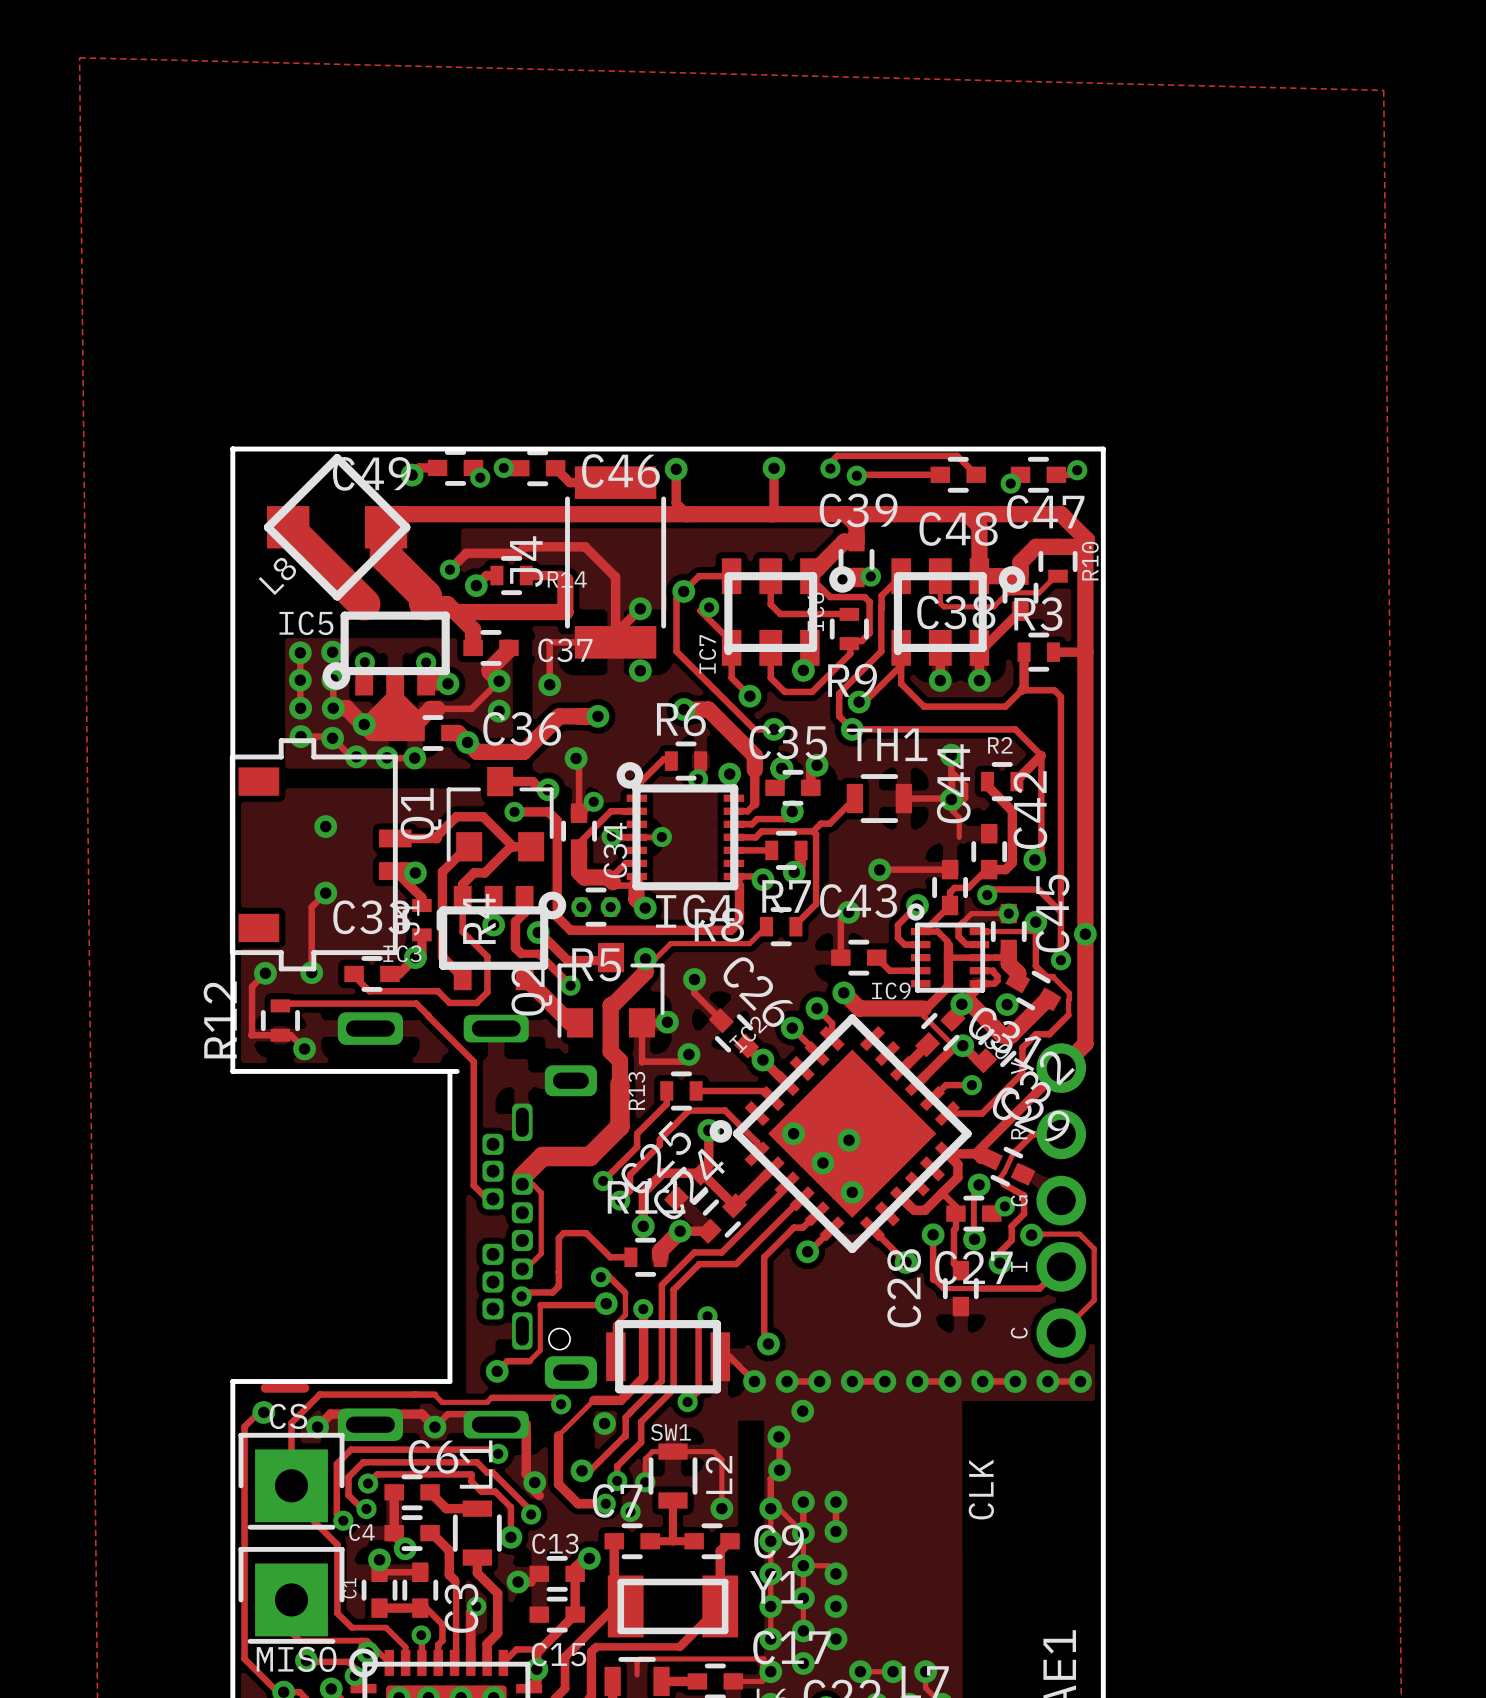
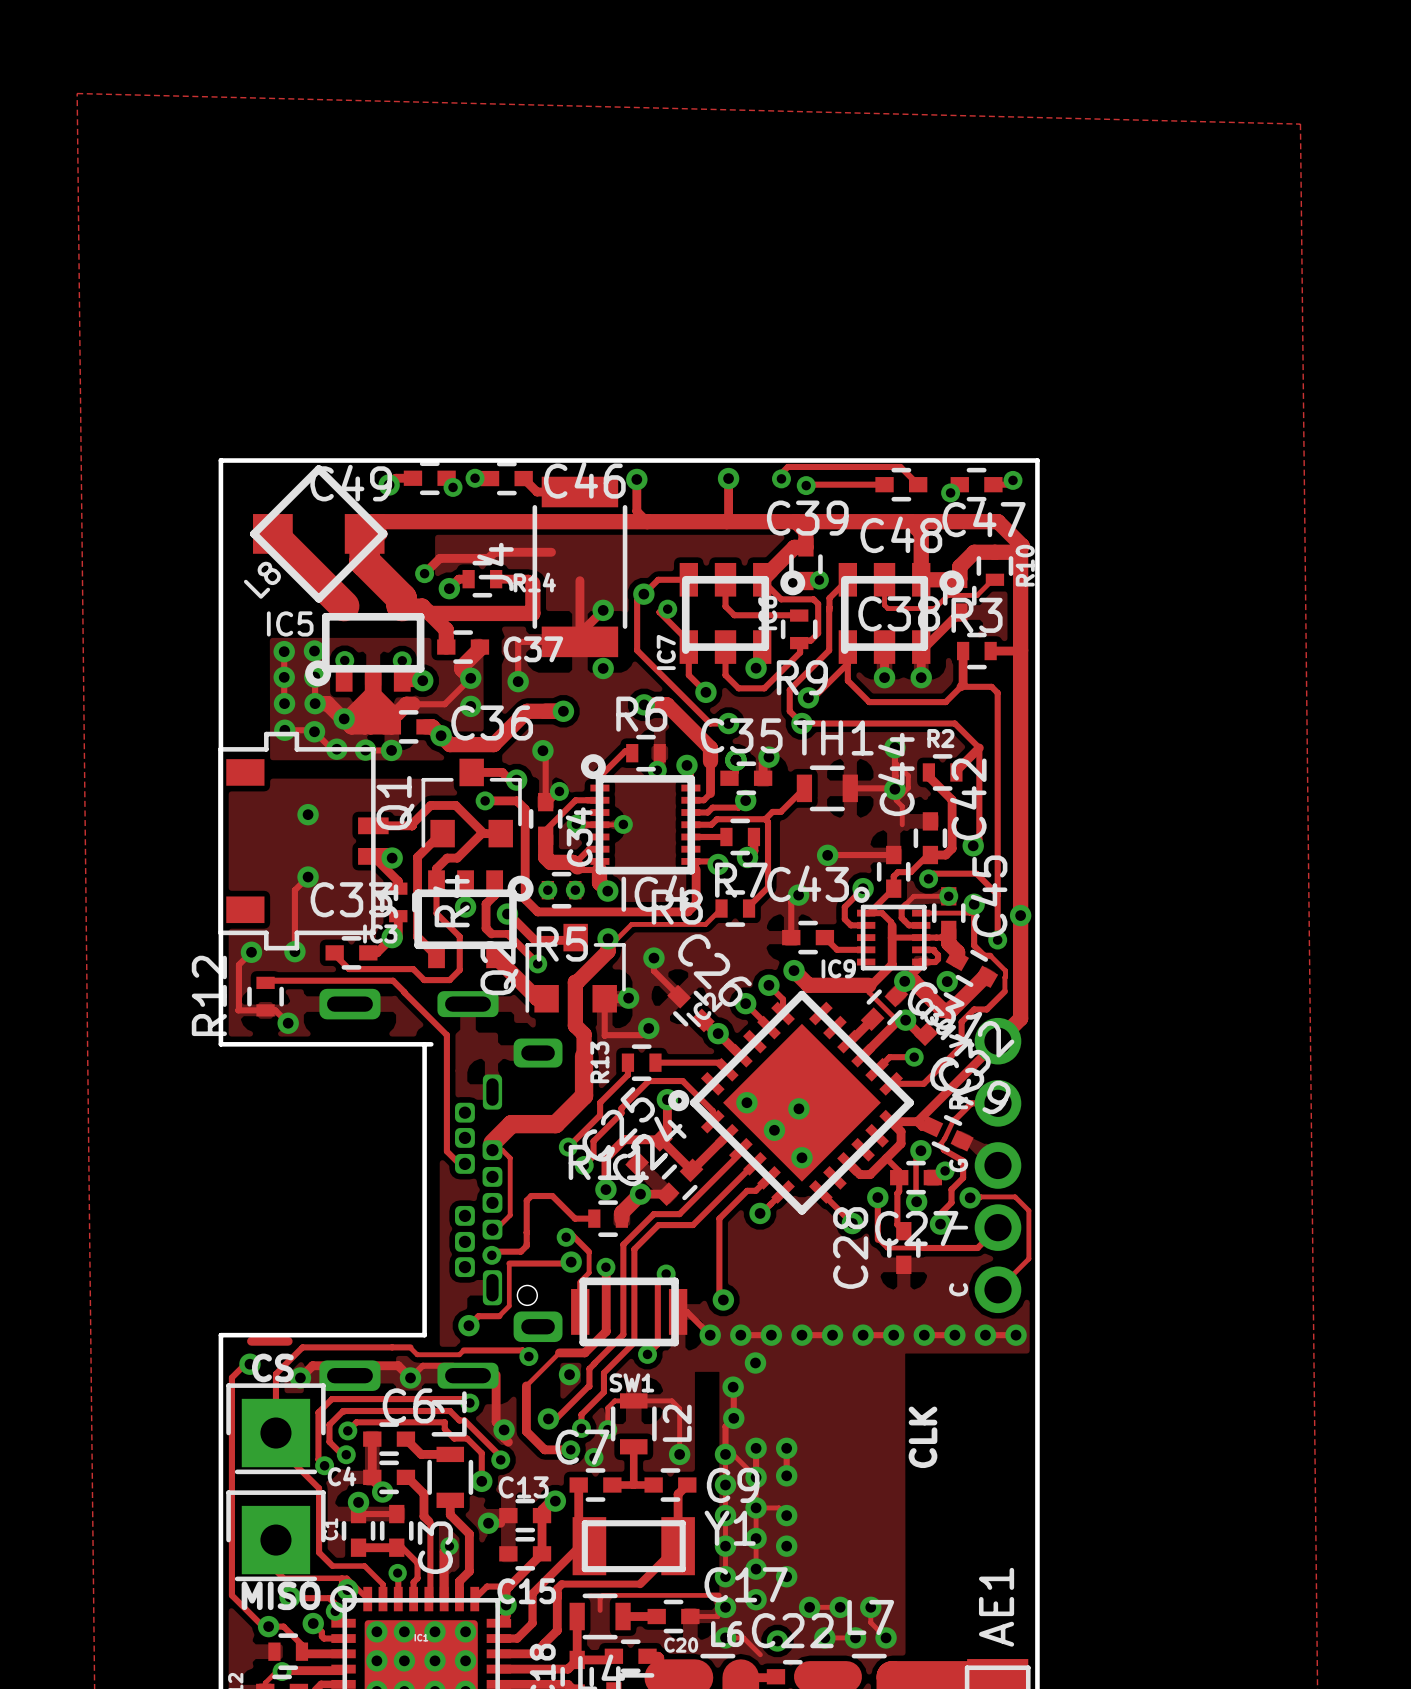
track: (585, 546) (615, 577) -> none

